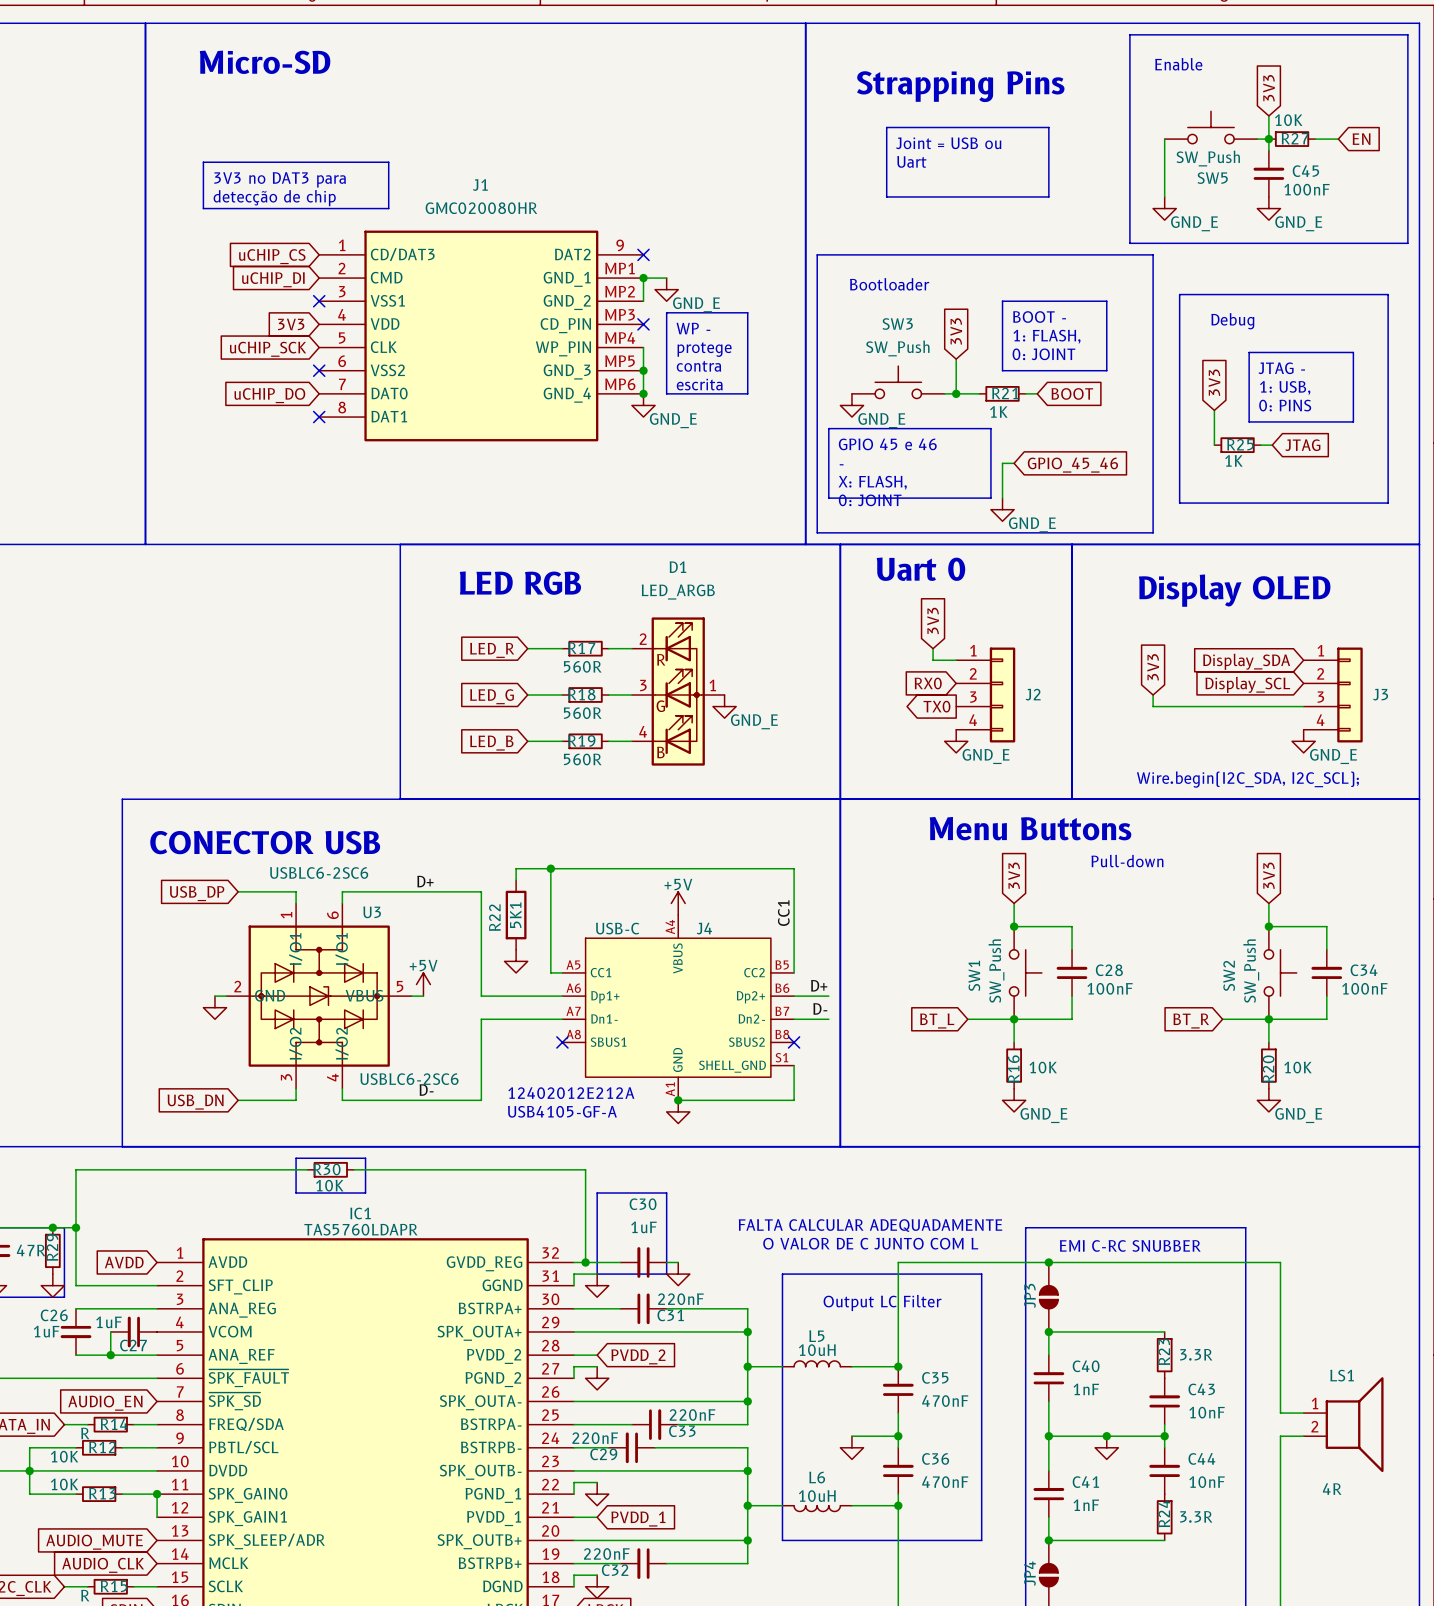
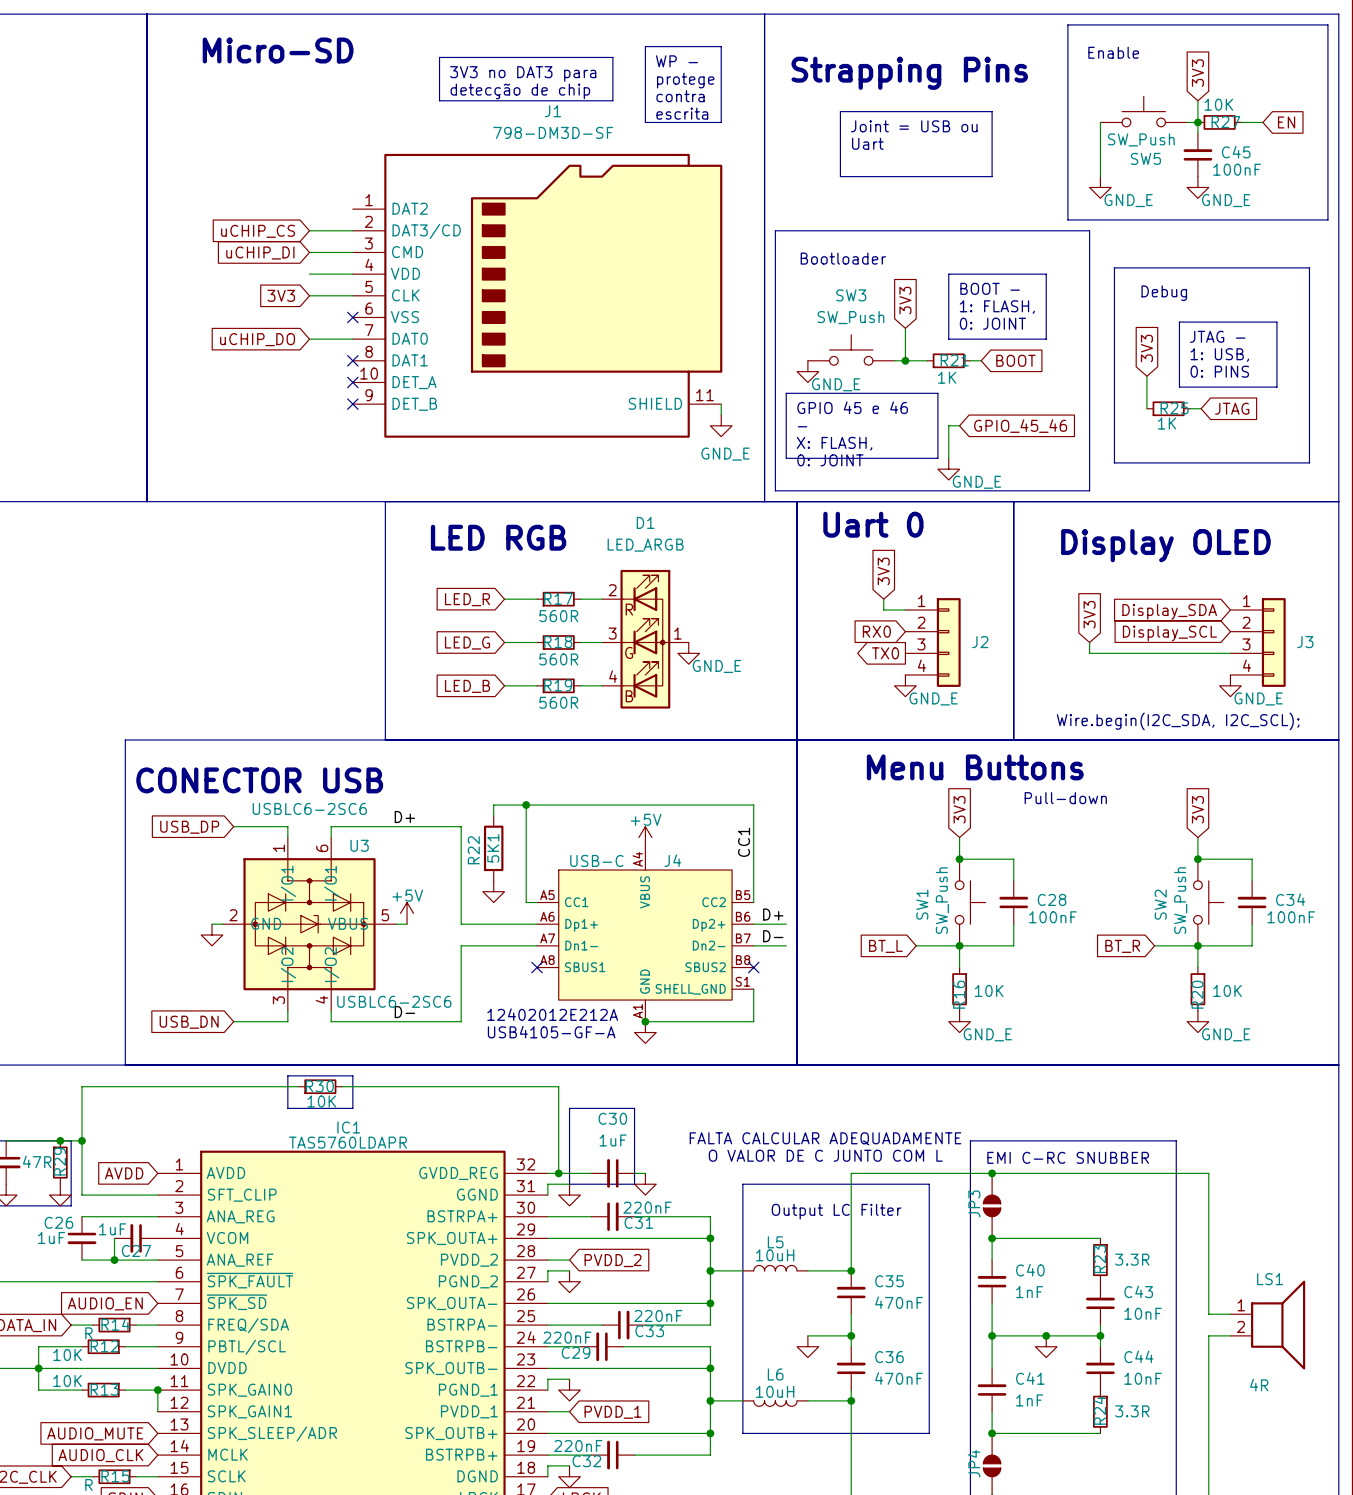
line: none -> (645, 46) (721, 46) (721, 122) (645, 122) (645, 46)
line: none -> (439, 57) (612, 57) (612, 100) (439, 100) (439, 57)
text: none -> WP - (676, 61)
text: none -> 3V3 no DAT3 para (523, 73)
text: none -> protege (685, 80)
text: none -> detecção de chip (520, 91)
text: none -> contra (680, 96)
text: none -> escrita (682, 113)
line: (203, 162) (388, 162) (388, 208) (203, 208) (203, 162) -> none
text: 3V3 no DAT3 para (280, 179) -> none
J1 name position: J1 (480, 185) -> J1 (553, 111)
text: detecção de chip (274, 198) -> none
J1 value: GMC020080HR (481, 208) -> 798-DM3D-SF (553, 132)
J1 symbol: [319, 230, 644, 442] -> [352, 153, 723, 438]
no-connect mark: (643, 254) -> none
junction: (643, 278) -> none
power symbol: GND_E (666, 289) -> none
no-connect mark: (319, 301) -> none
line: (666, 312) (747, 312) (747, 393) (666, 393) (666, 312) -> none
no-connect mark: (643, 324) -> none
text: WP - (693, 328) -> none
no-connect mark: none -> (352, 317)
global label: uCHIP_SCK (268, 349) -> none
text: protege (704, 349) -> none
text: contra (698, 366) -> none
no-connect mark: (319, 370) -> none
junction: (643, 370) -> none
text: escrita (699, 384) -> none
no-connect mark: none -> (352, 360)
junction: (643, 393) -> none
global label position: uCHIP_DO (269, 395) -> uCHIP_DO (257, 339)
power symbol: GND_E (643, 405) -> none
no-connect mark: (319, 417) -> none
no-connect mark: none -> (352, 382)
no-connect mark: none -> (352, 404)
wire: none -> (721, 404) (721, 414)
power symbol: none -> GND_E (721, 425)

